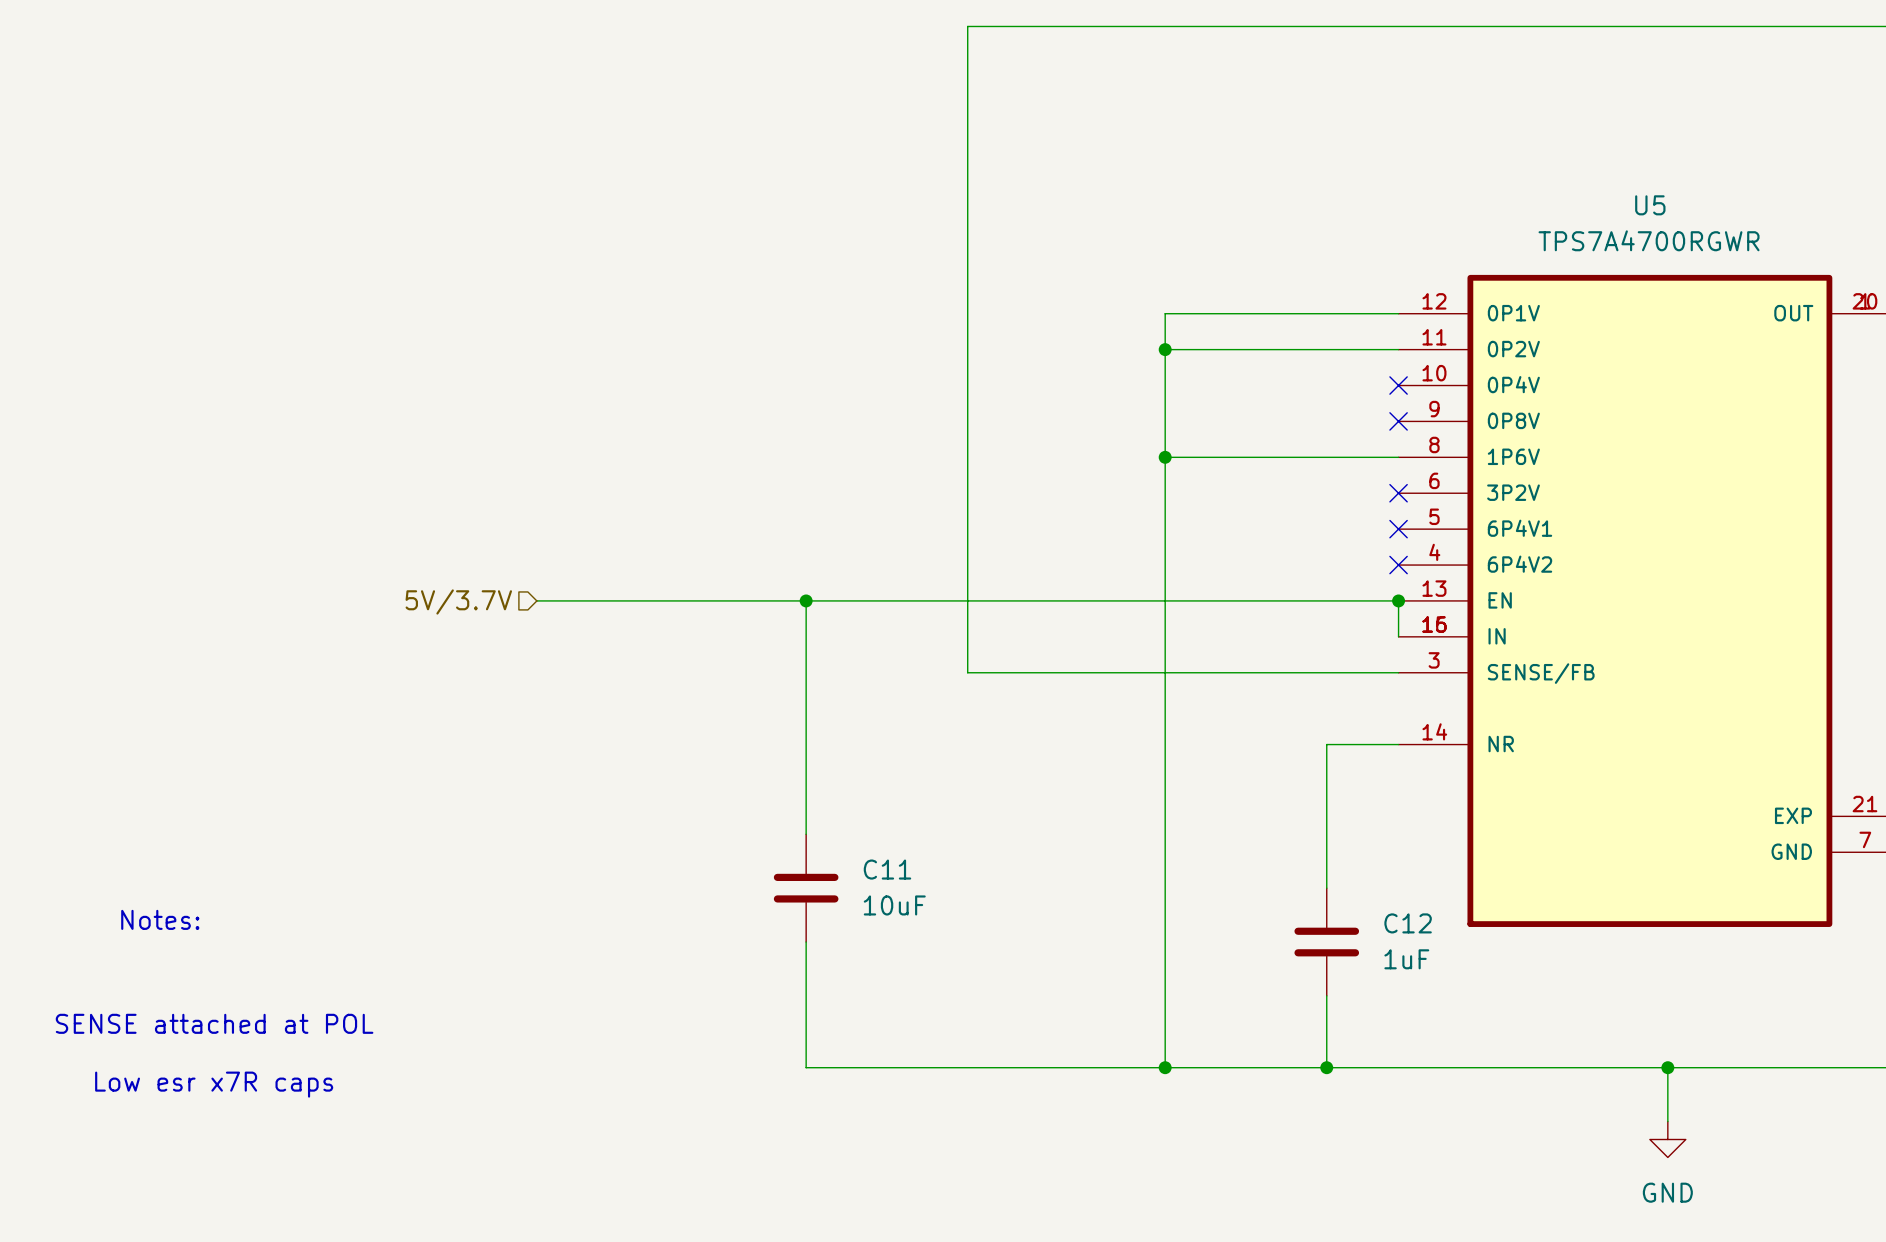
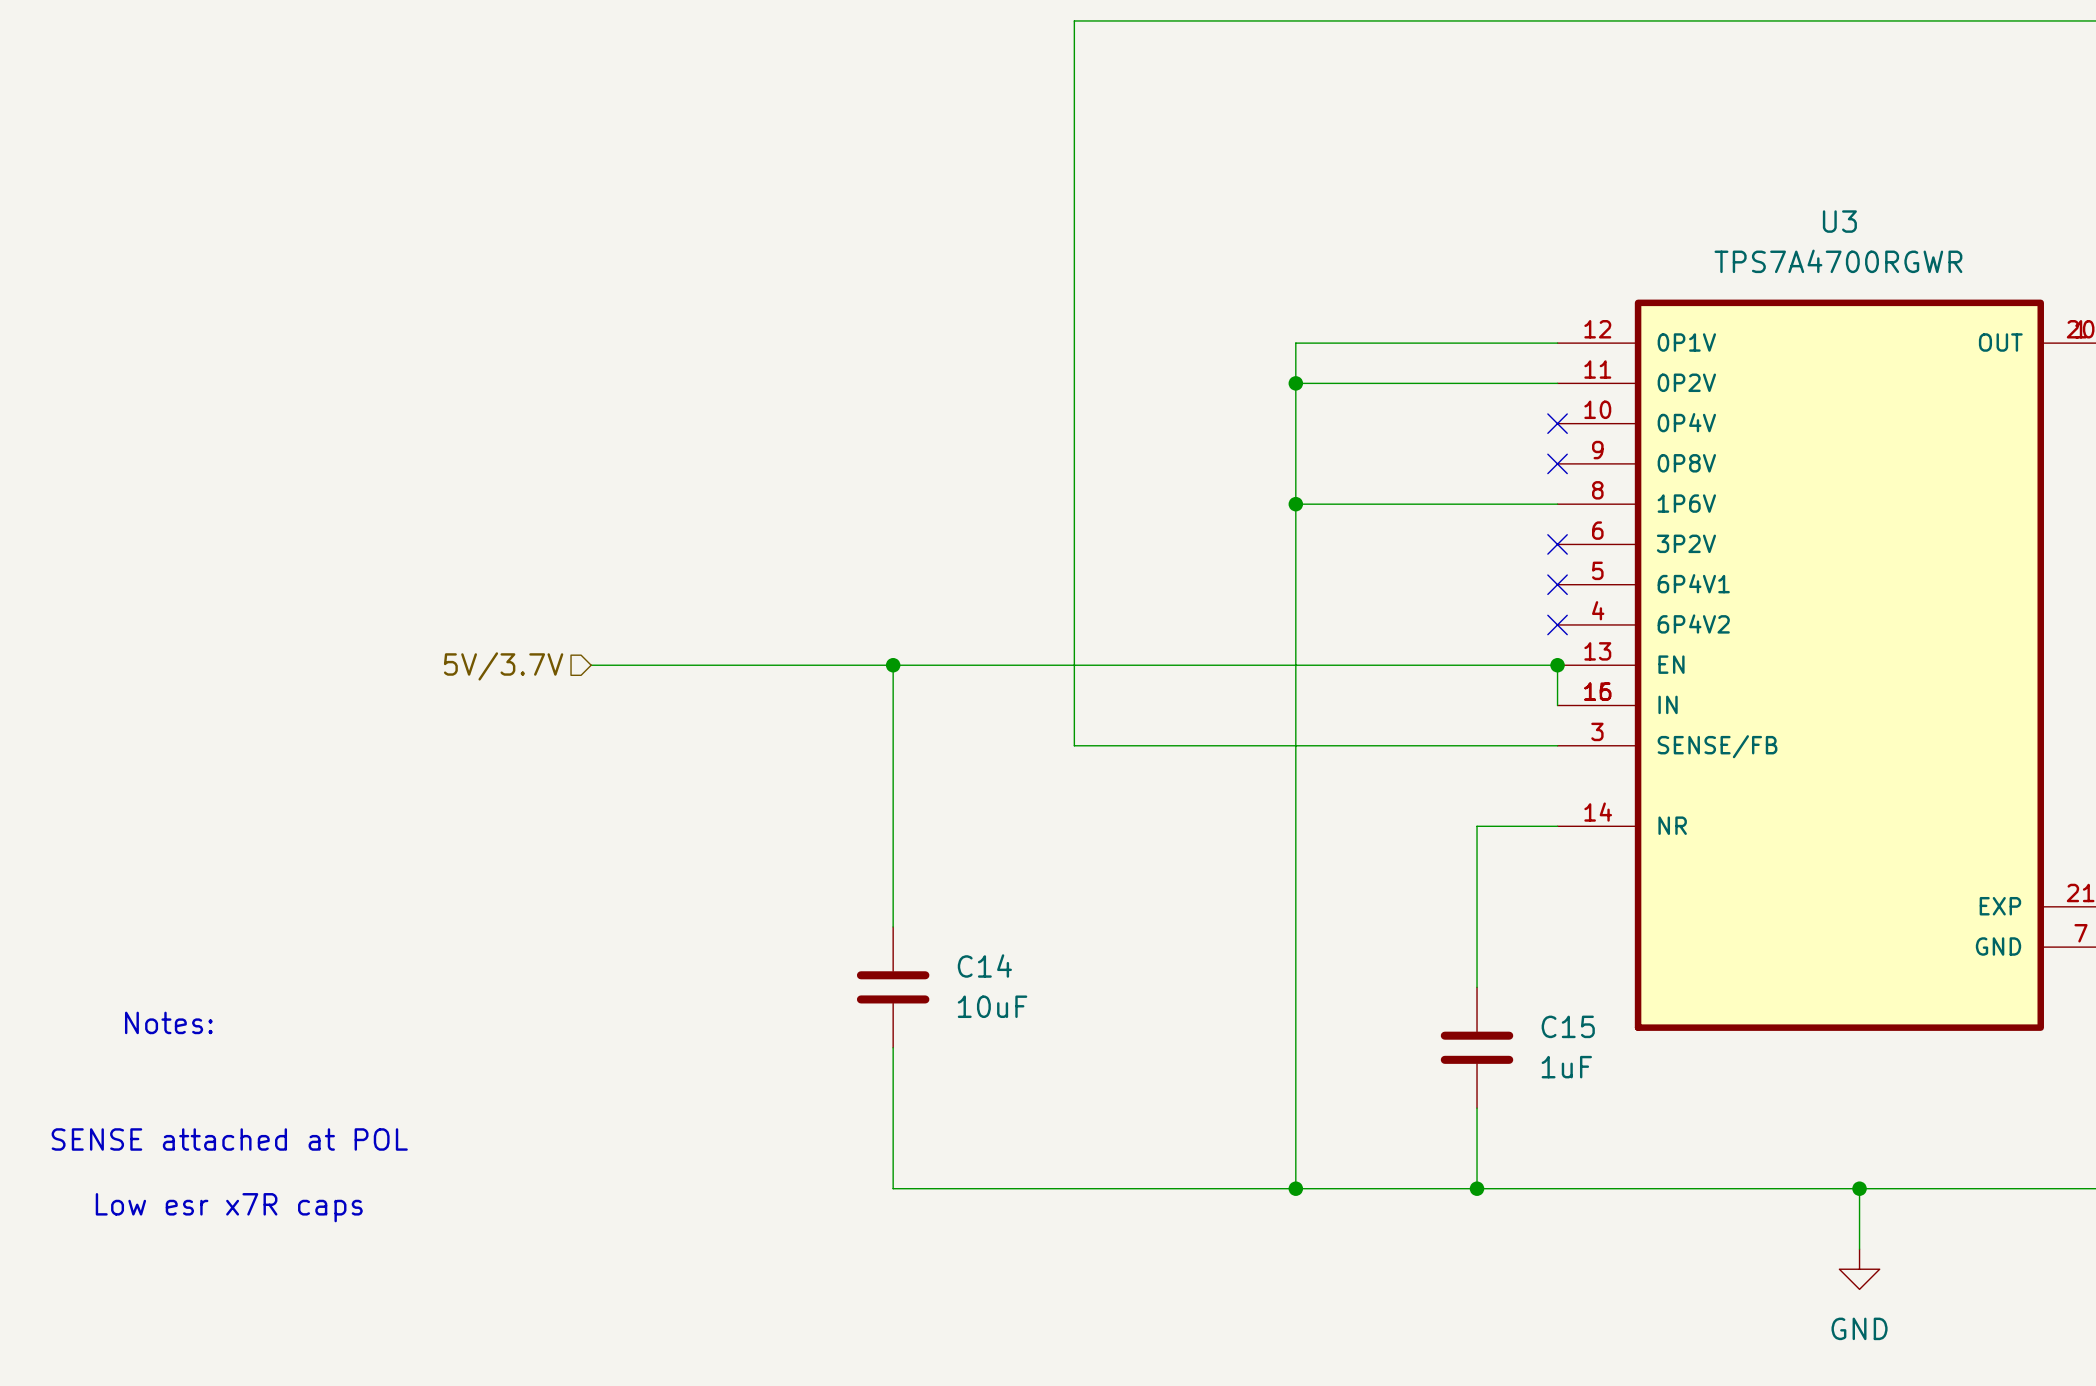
U5 name: U5 (1650, 205) -> U3 (1839, 221)
C11 name: C11 (887, 869) -> C14 (984, 966)
C12 name: C12 (1408, 923) -> C15 (1568, 1026)

